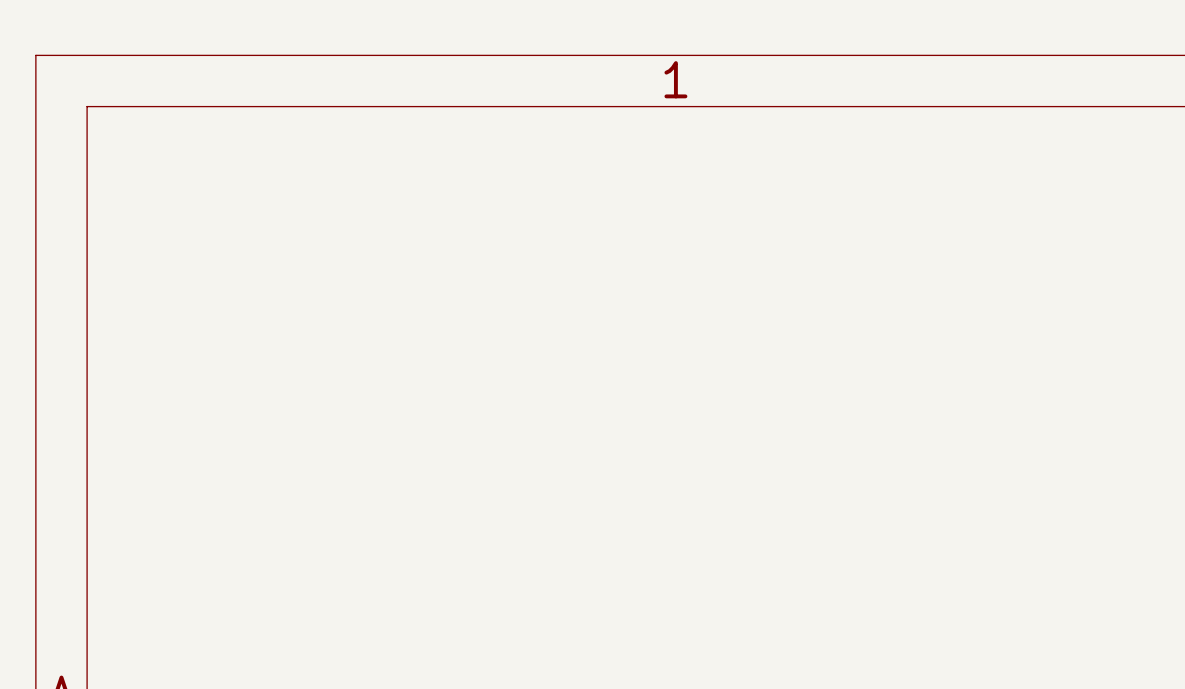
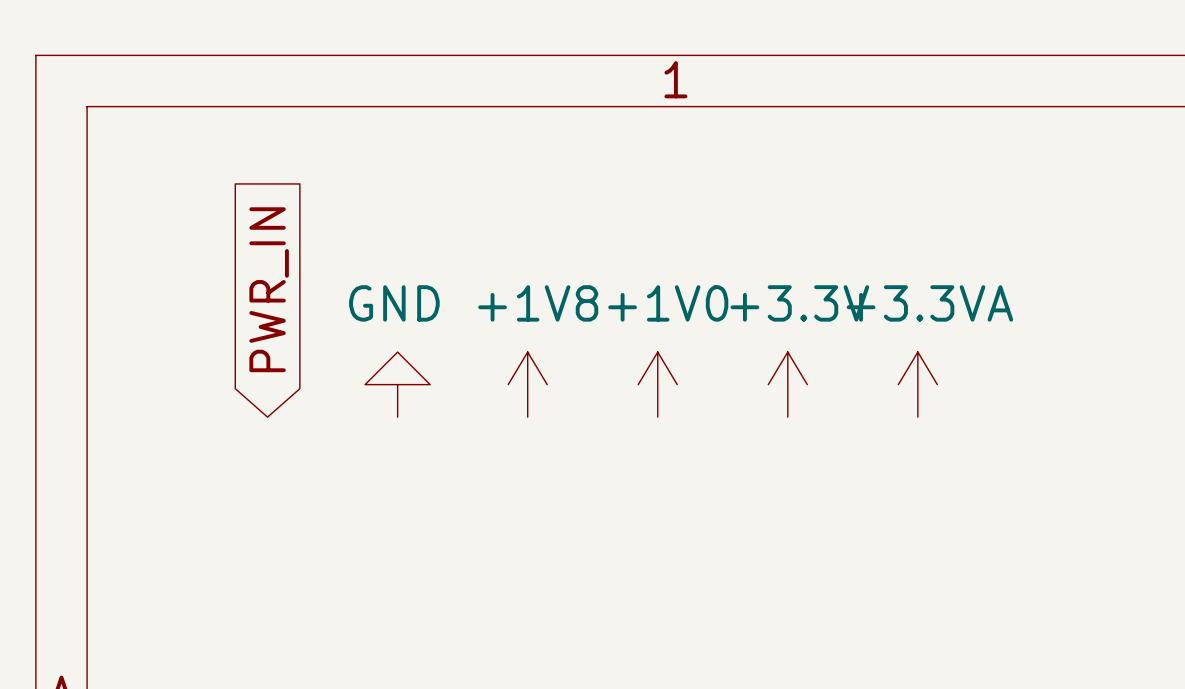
global label: none -> PWR_IN (269, 289)
power symbol: none -> GND (397, 384)
power symbol: none -> +1V8 (527, 384)
power symbol: none -> +1V0 (657, 384)
power symbol: none -> +3.3V (787, 384)
power symbol: none -> +3.3VA (917, 384)

